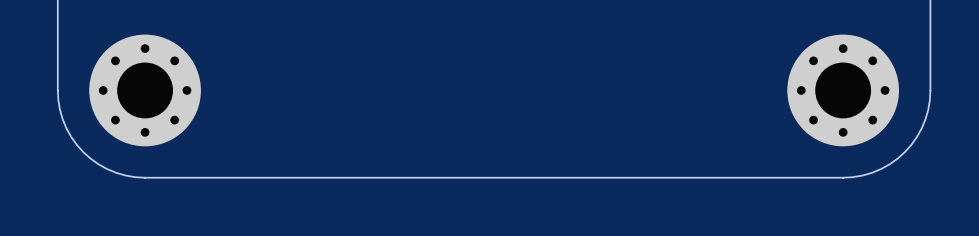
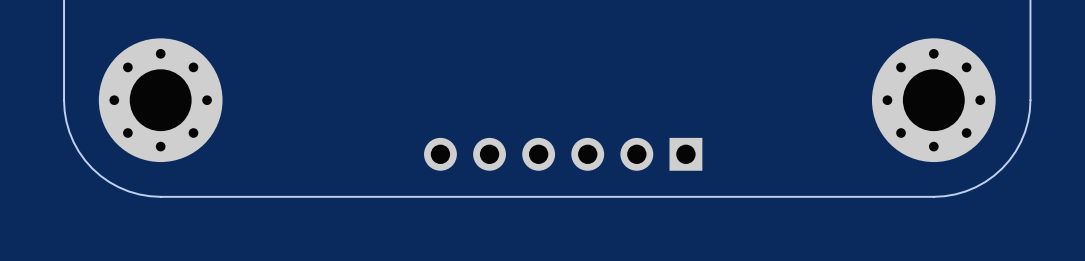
part: none -> (563, 154)

